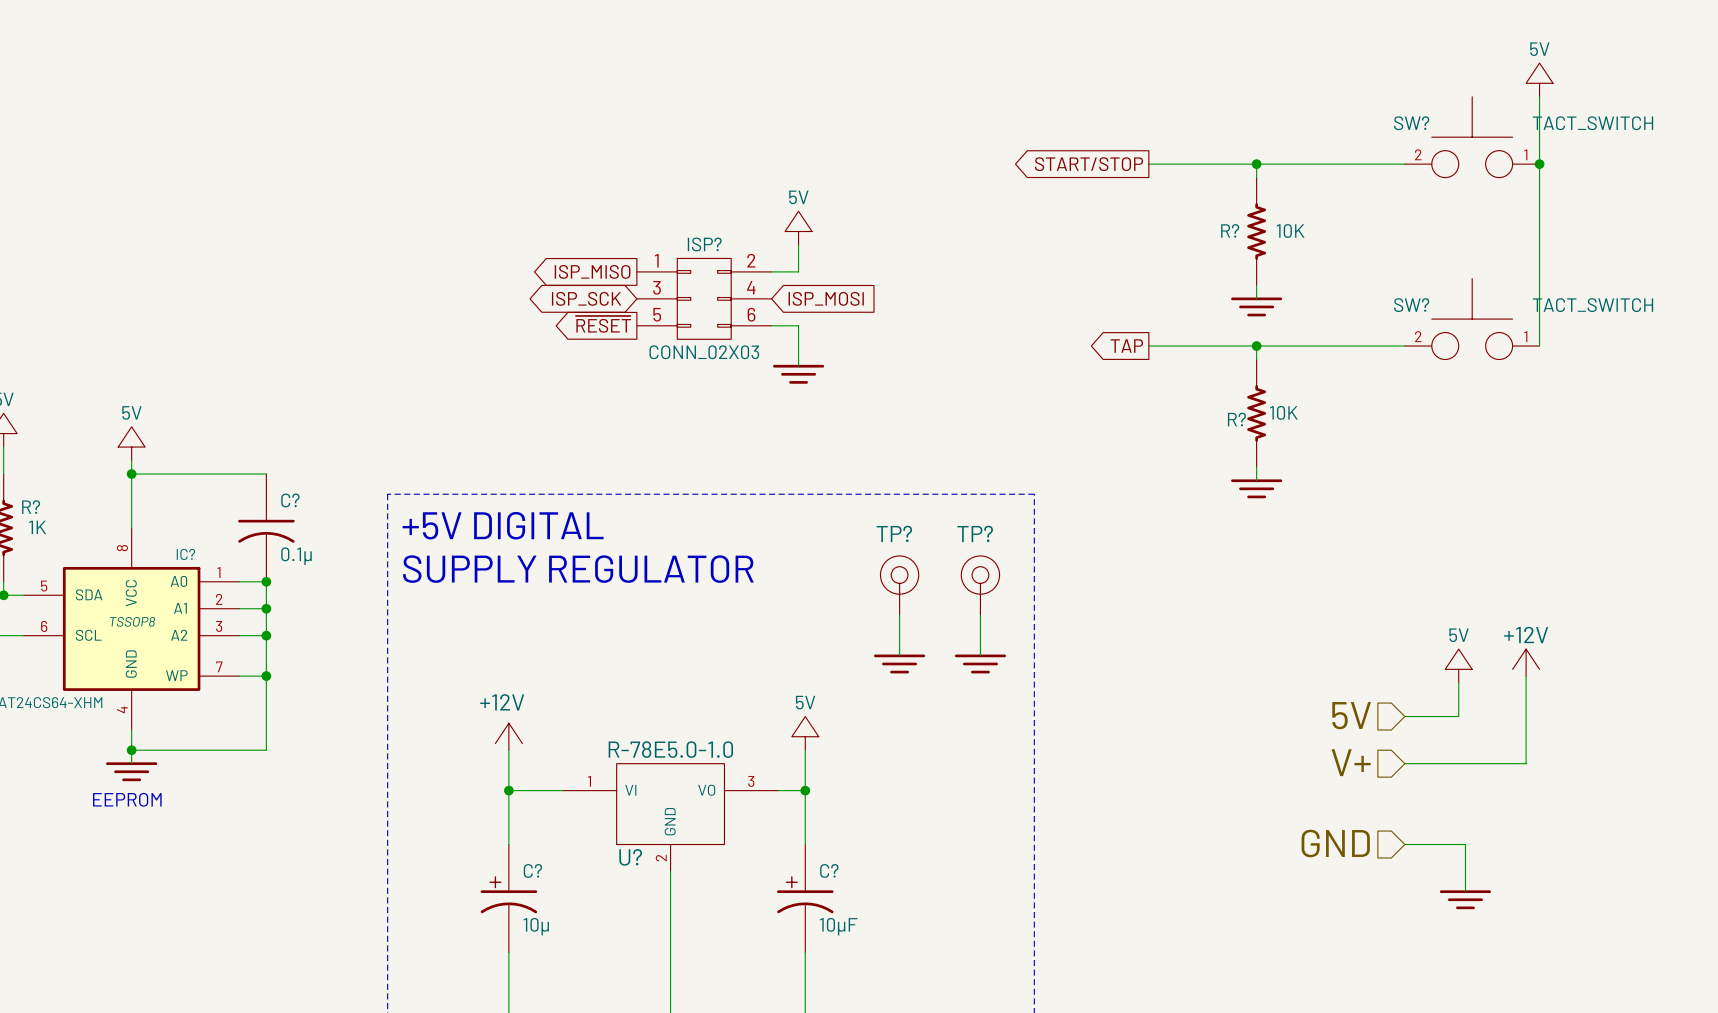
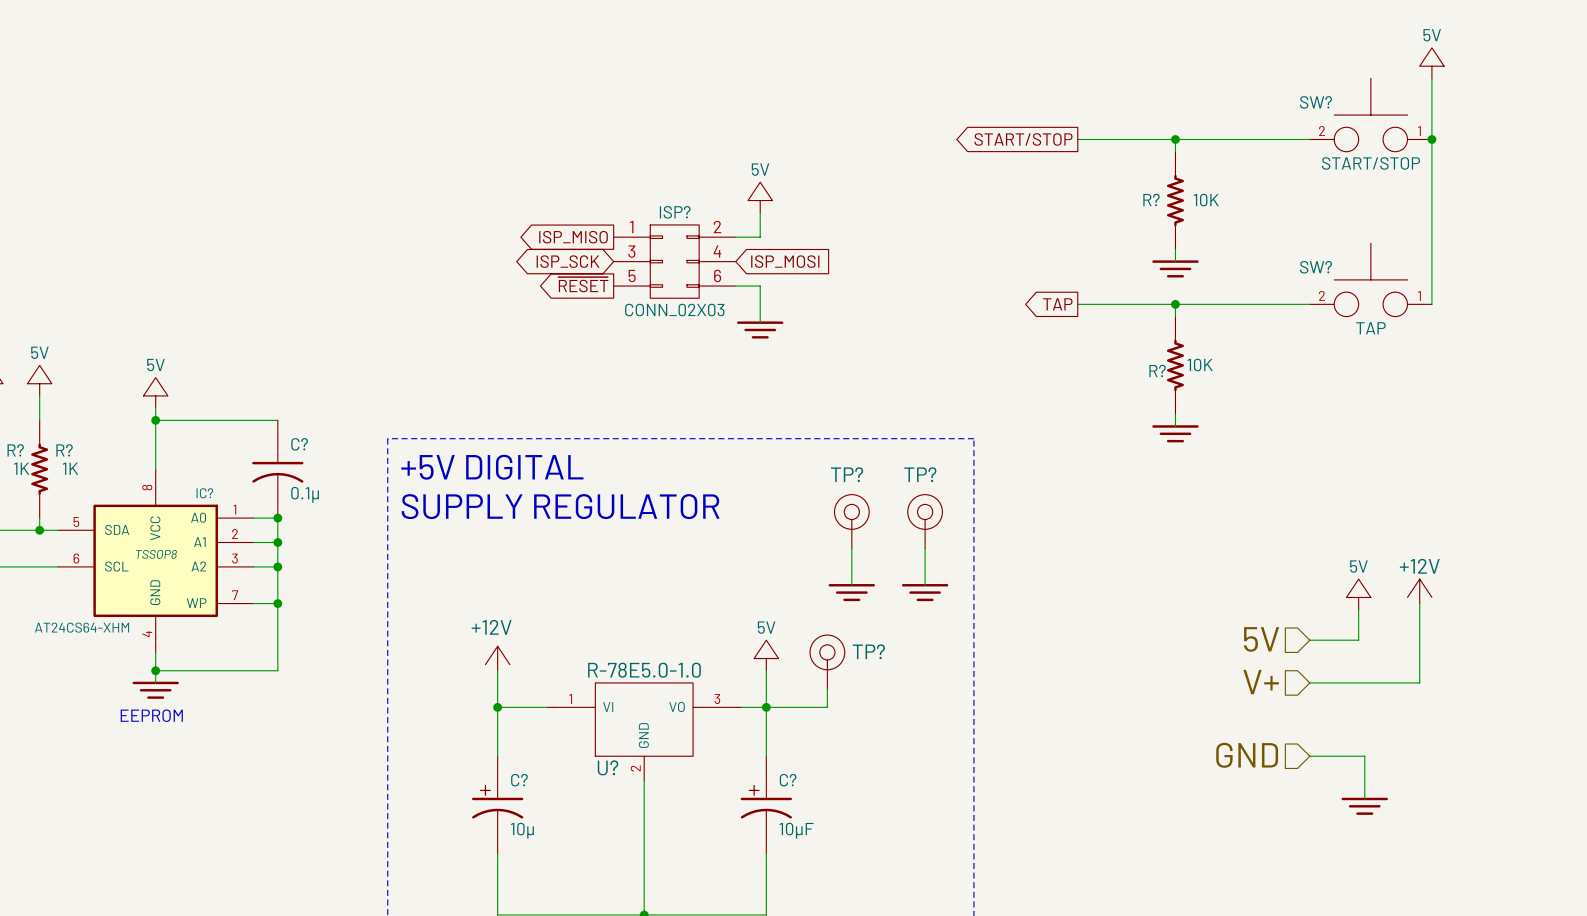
SW? value: TACT_SWITCH (1592, 123) -> START/STOP (1371, 163)
SW? value: TACT_SWITCH (1592, 305) -> TAP (1370, 328)
TP?: none -> (827, 662)
wire: none -> (827, 689) (827, 707) (766, 707)

